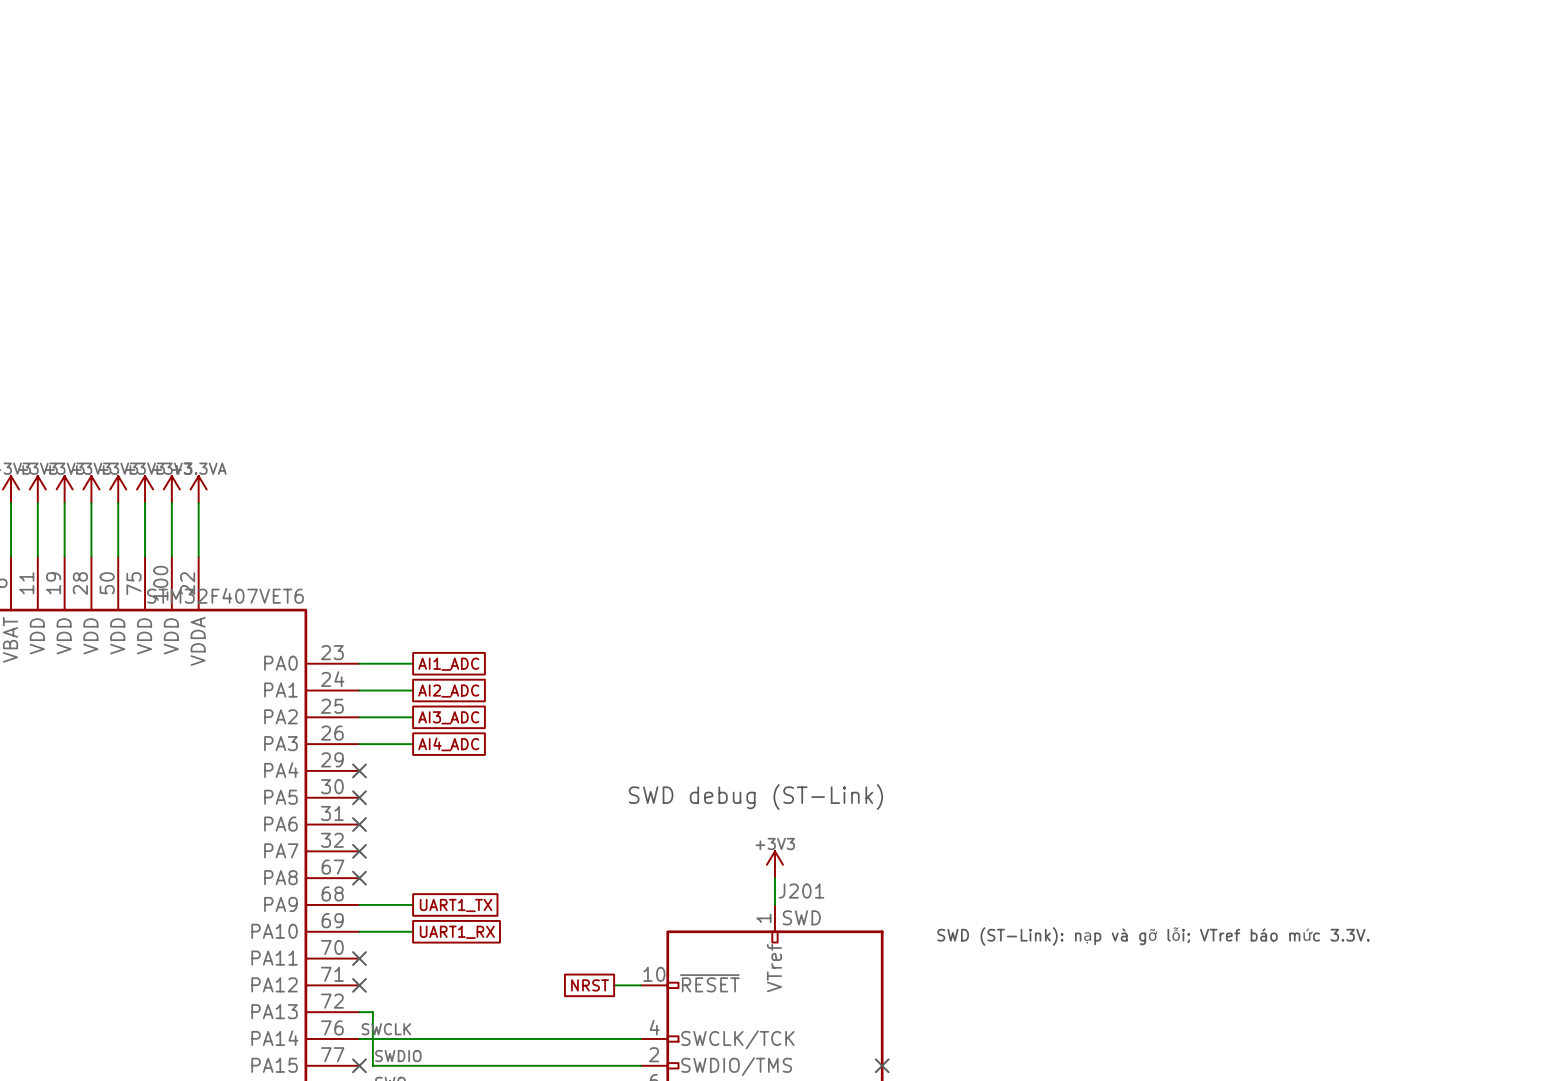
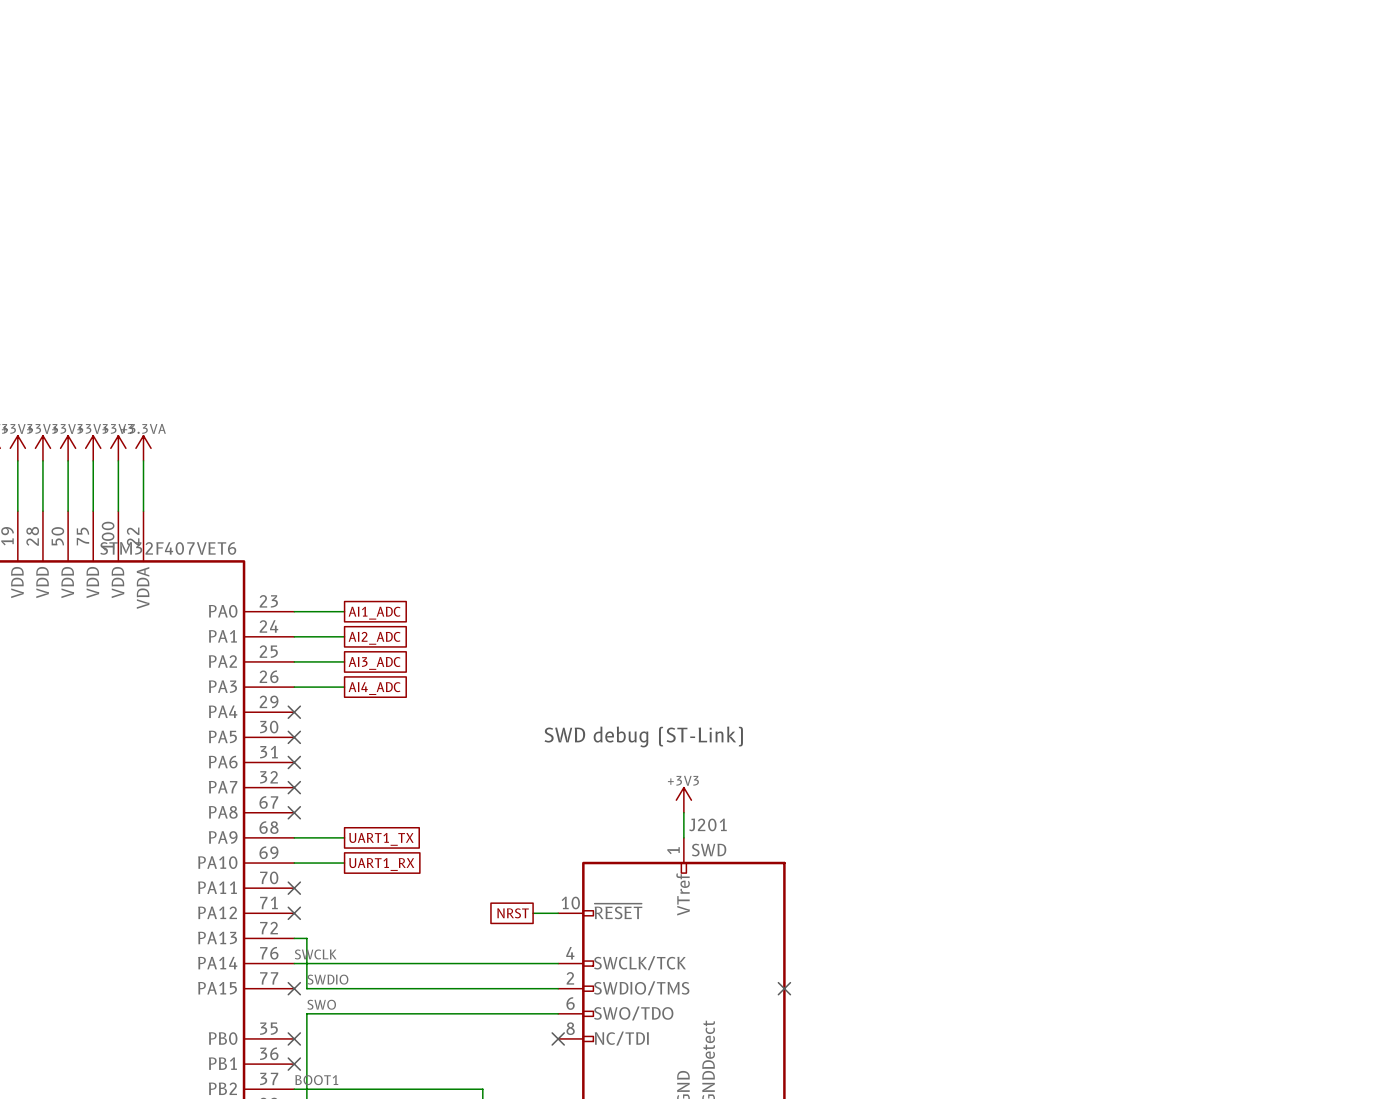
text: SWD (ST-Link): nạp và gỡ lỗi; VTref báo mức 3.3V. (1153, 936) -> none

